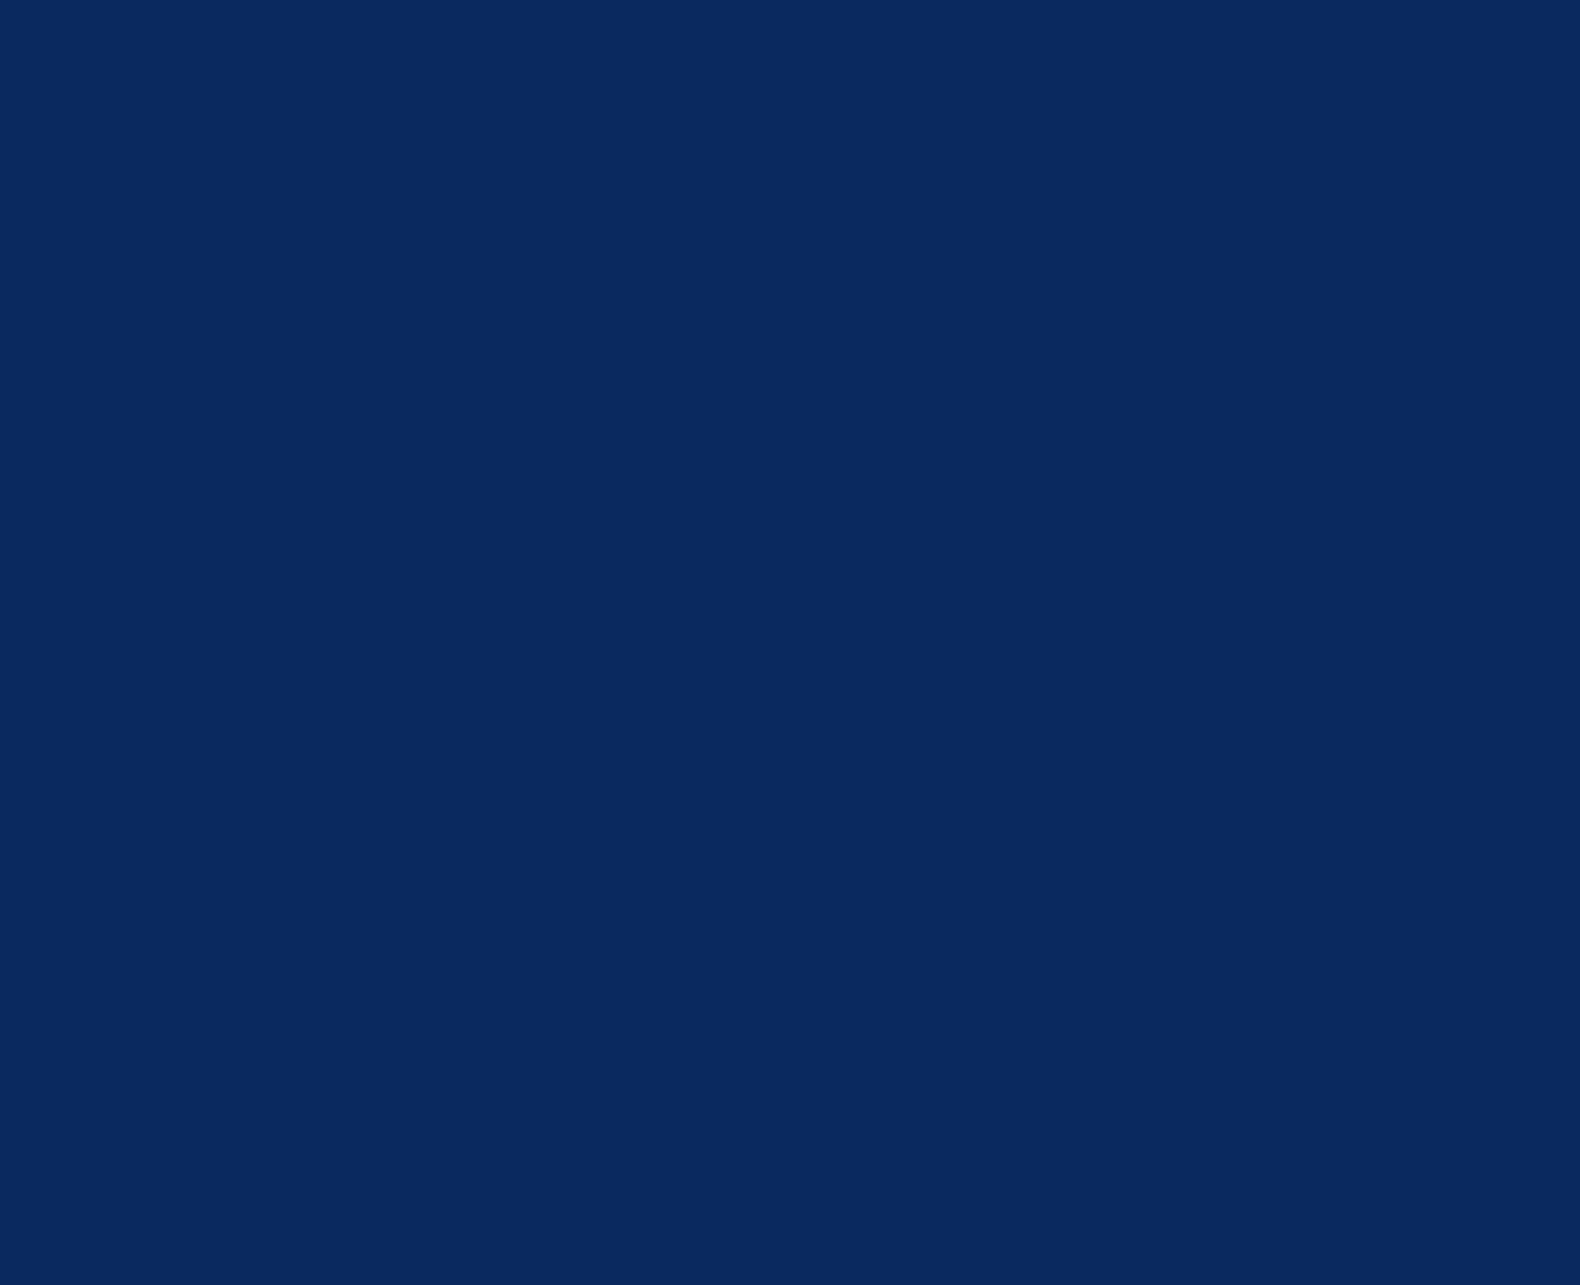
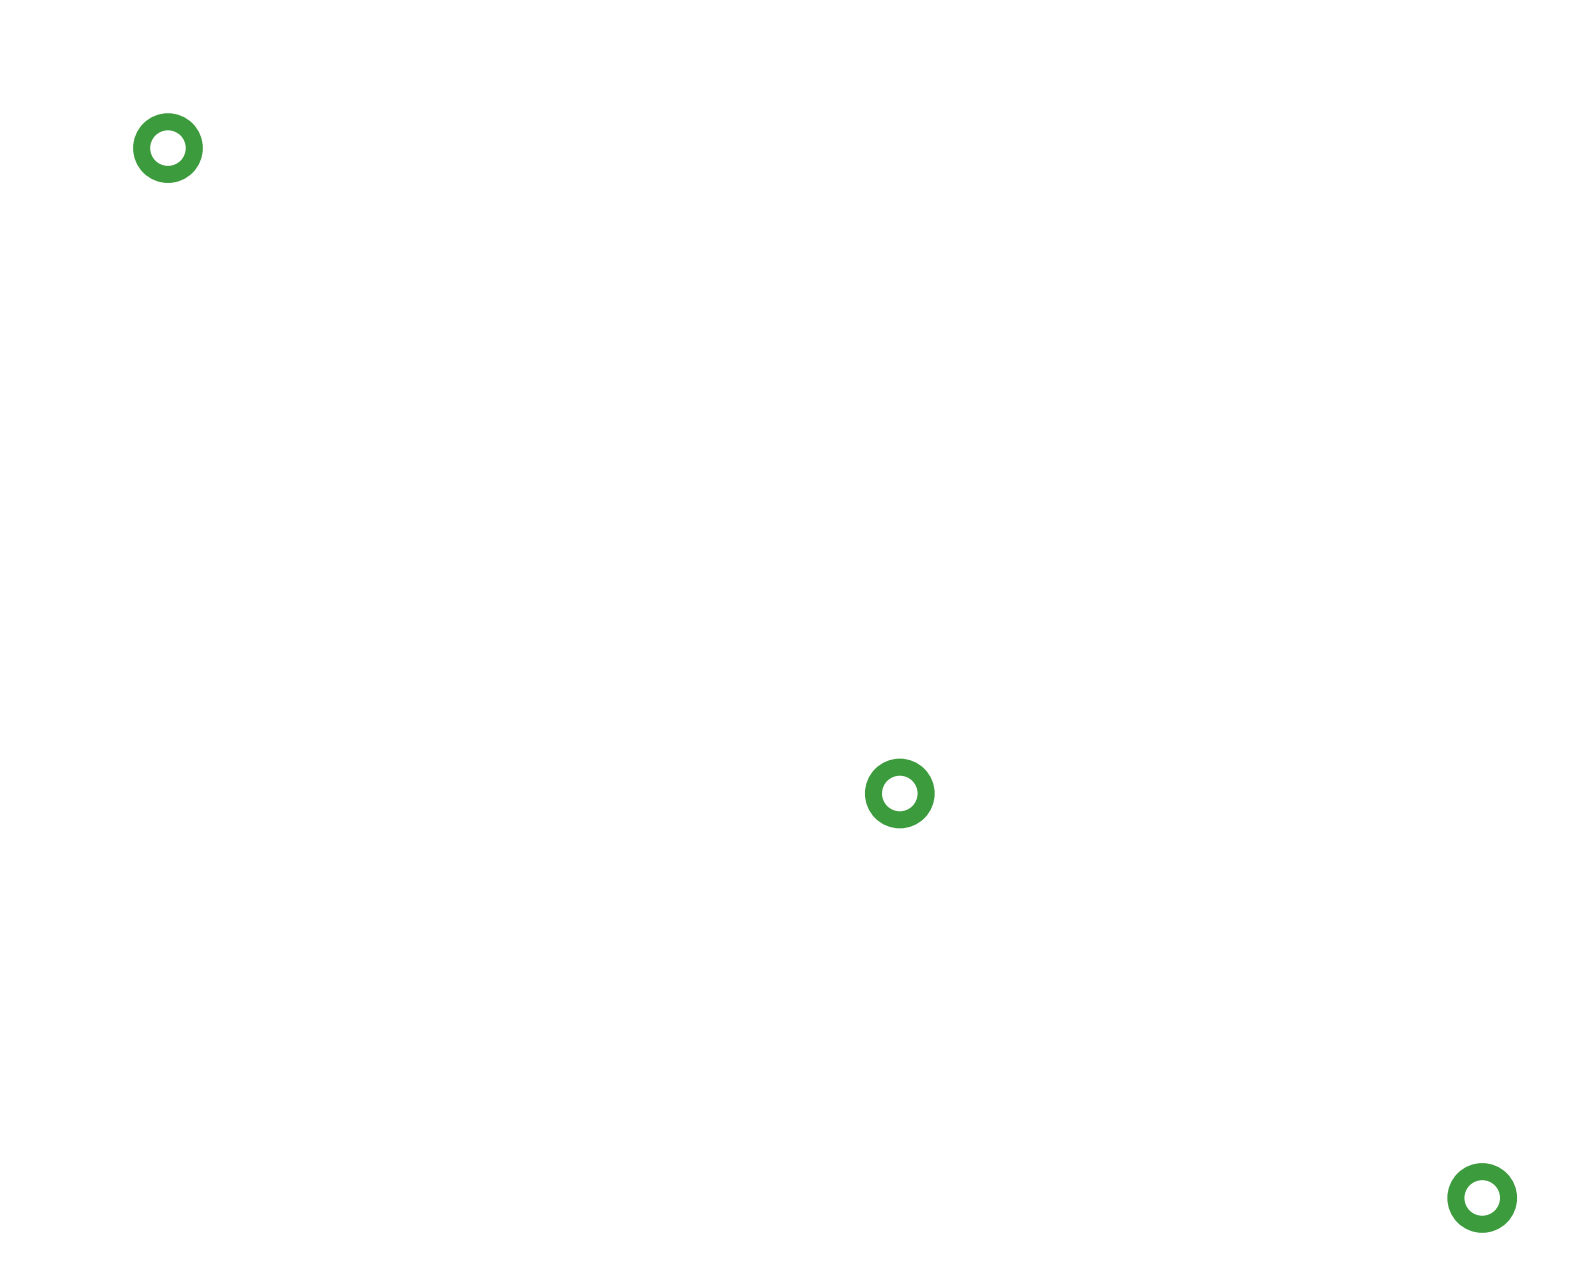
part: none -> (167, 148)
part: none -> (899, 793)
part: none -> (1482, 1197)

